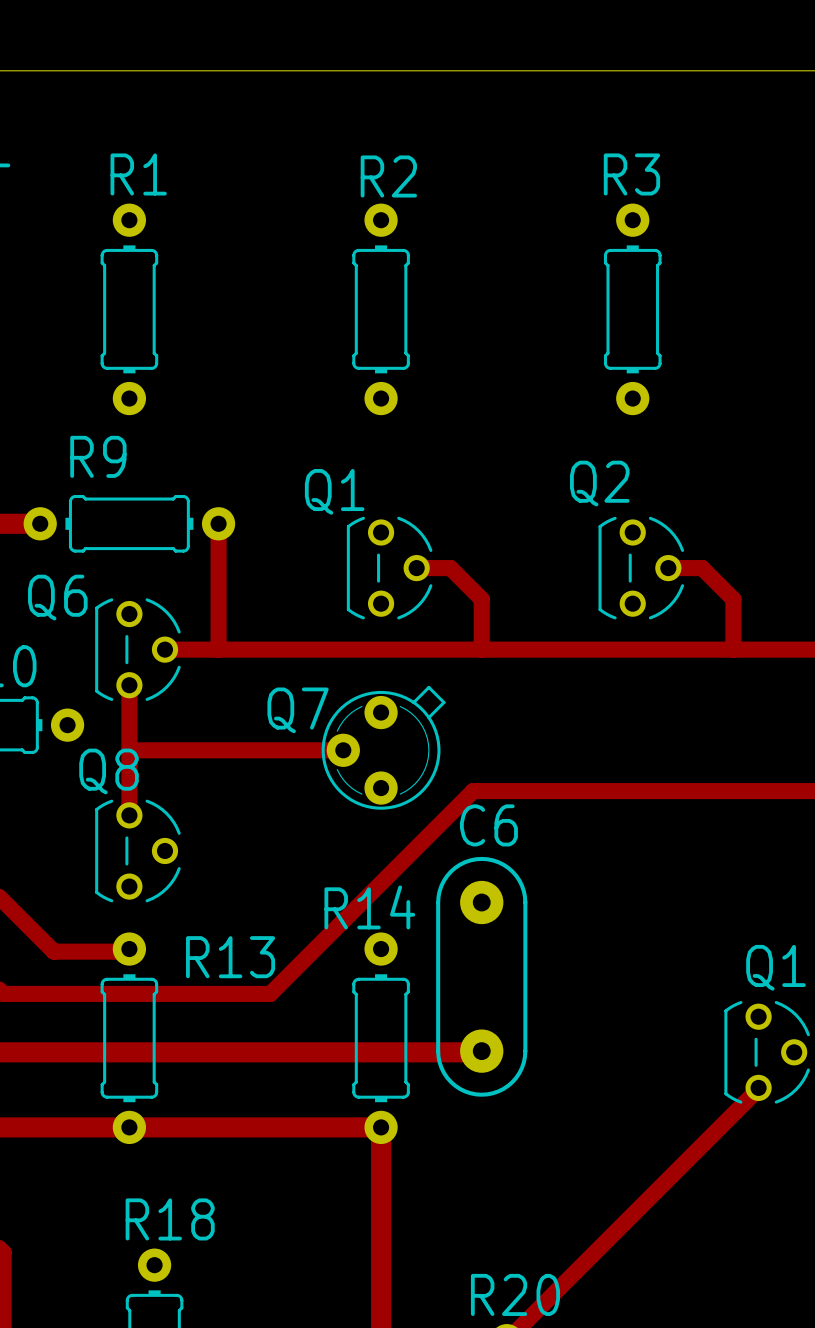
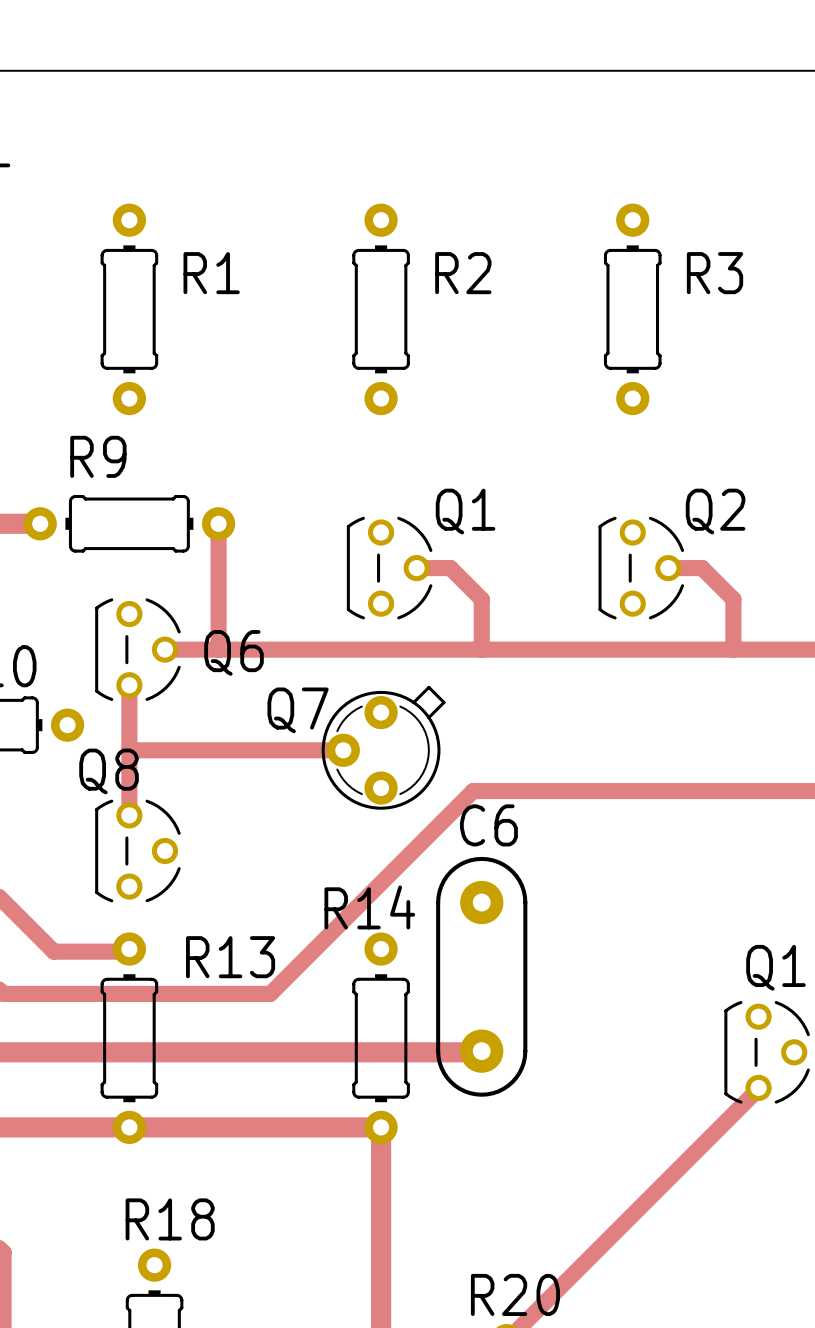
R1 name position: R1 (138, 174) -> R1 (211, 273)
R3 name position: R3 (631, 174) -> R3 (715, 273)
R2 name position: R2 (388, 176) -> R2 (463, 273)
Q2 name position: Q2 (599, 483) -> Q2 (715, 511)
Q1 name position: Q1 (334, 491) -> Q1 (465, 511)
Q6 name position: Q6 (57, 597) -> Q6 (234, 652)

